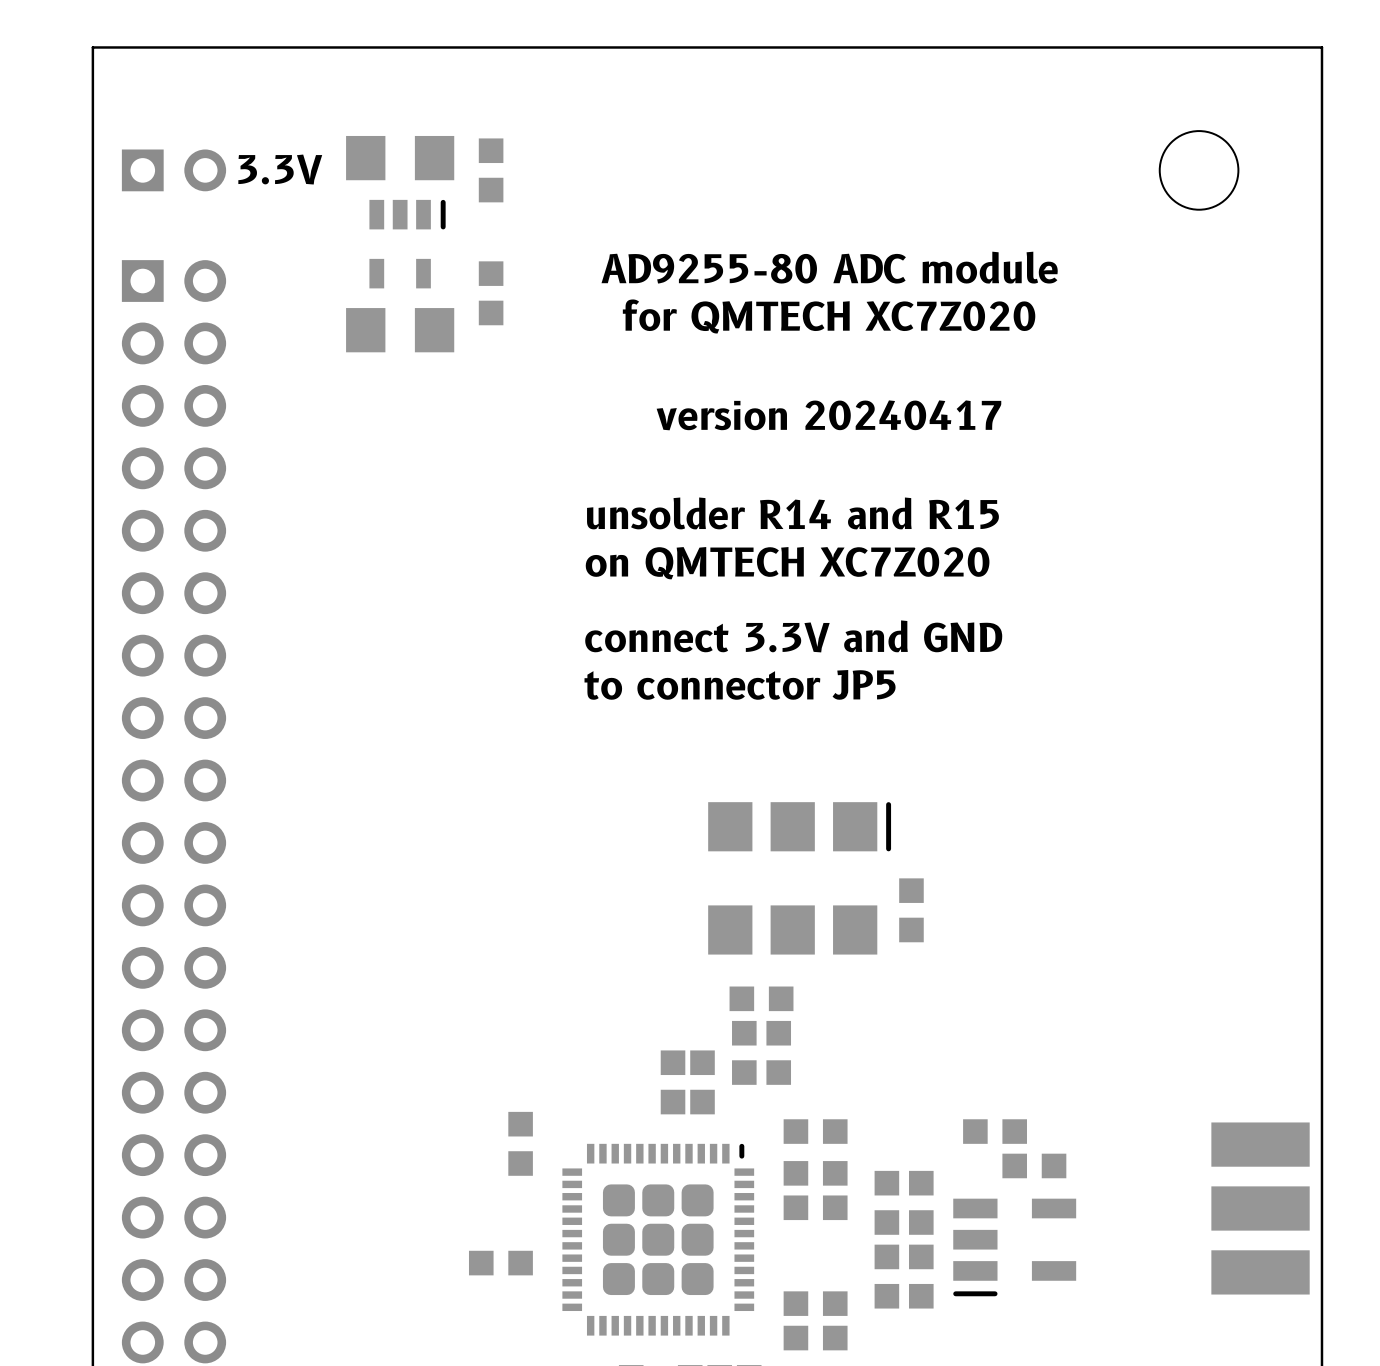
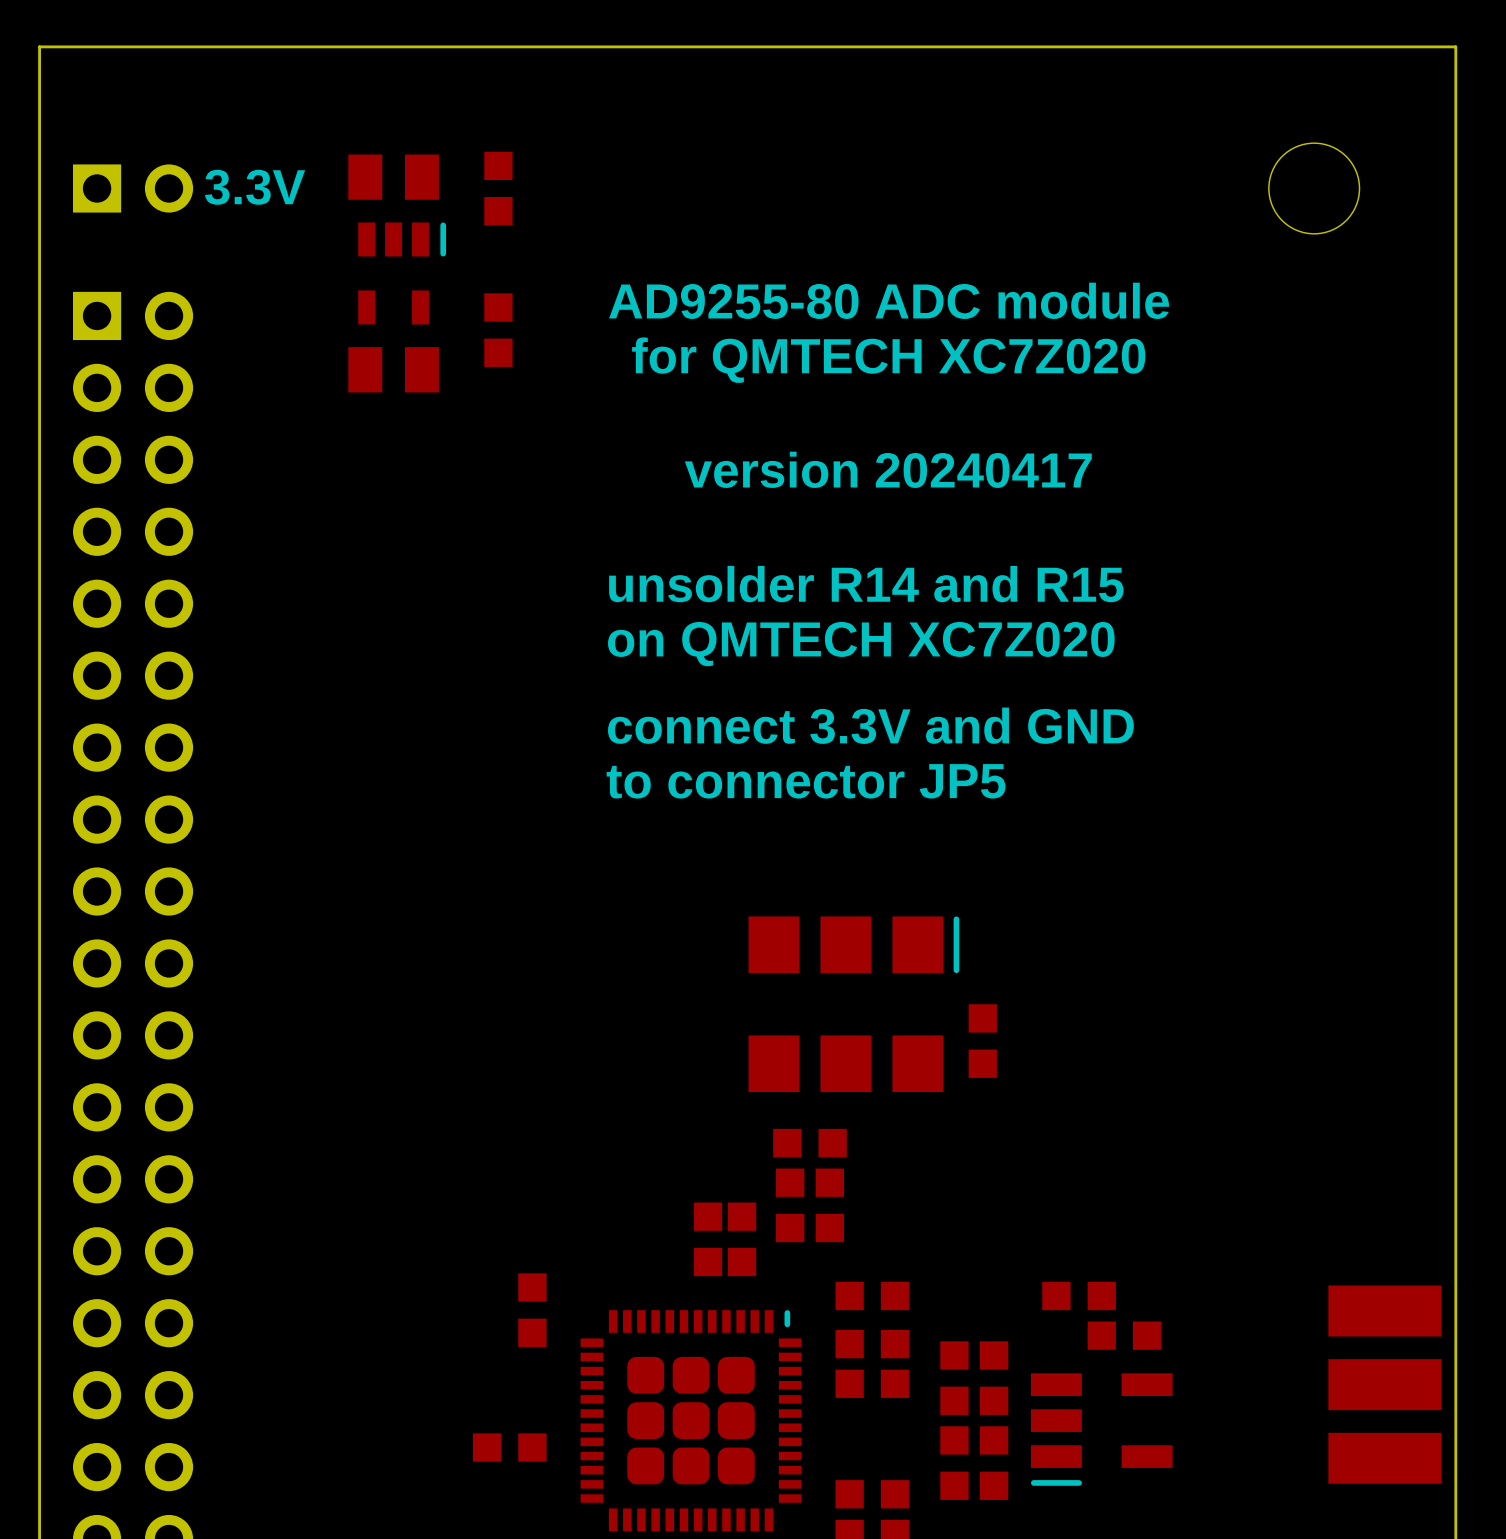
part footprint: [346, 135, 455, 181] -> [348, 154, 439, 200]
part footprint: [346, 308, 455, 353] -> [348, 347, 439, 393]

